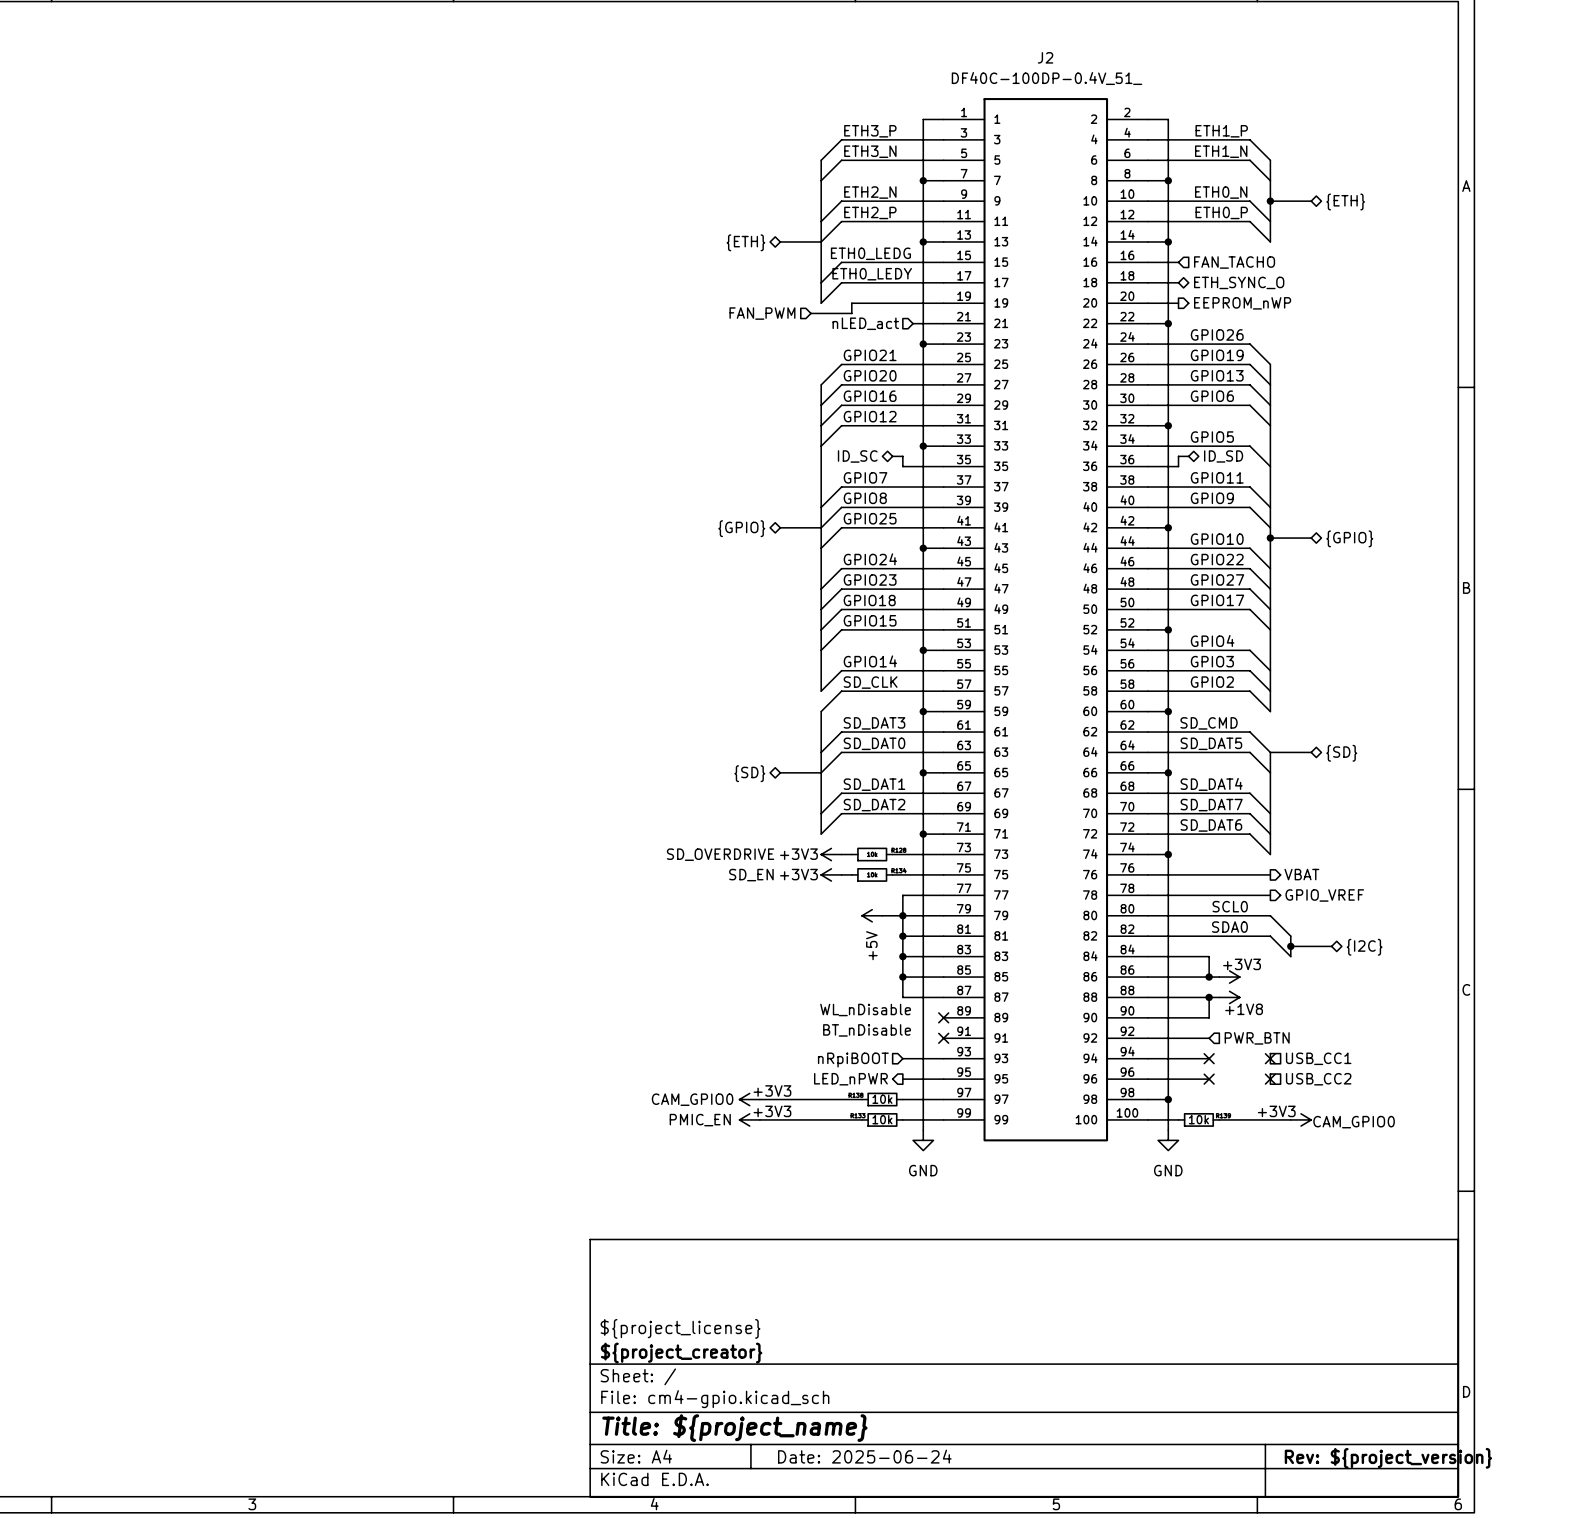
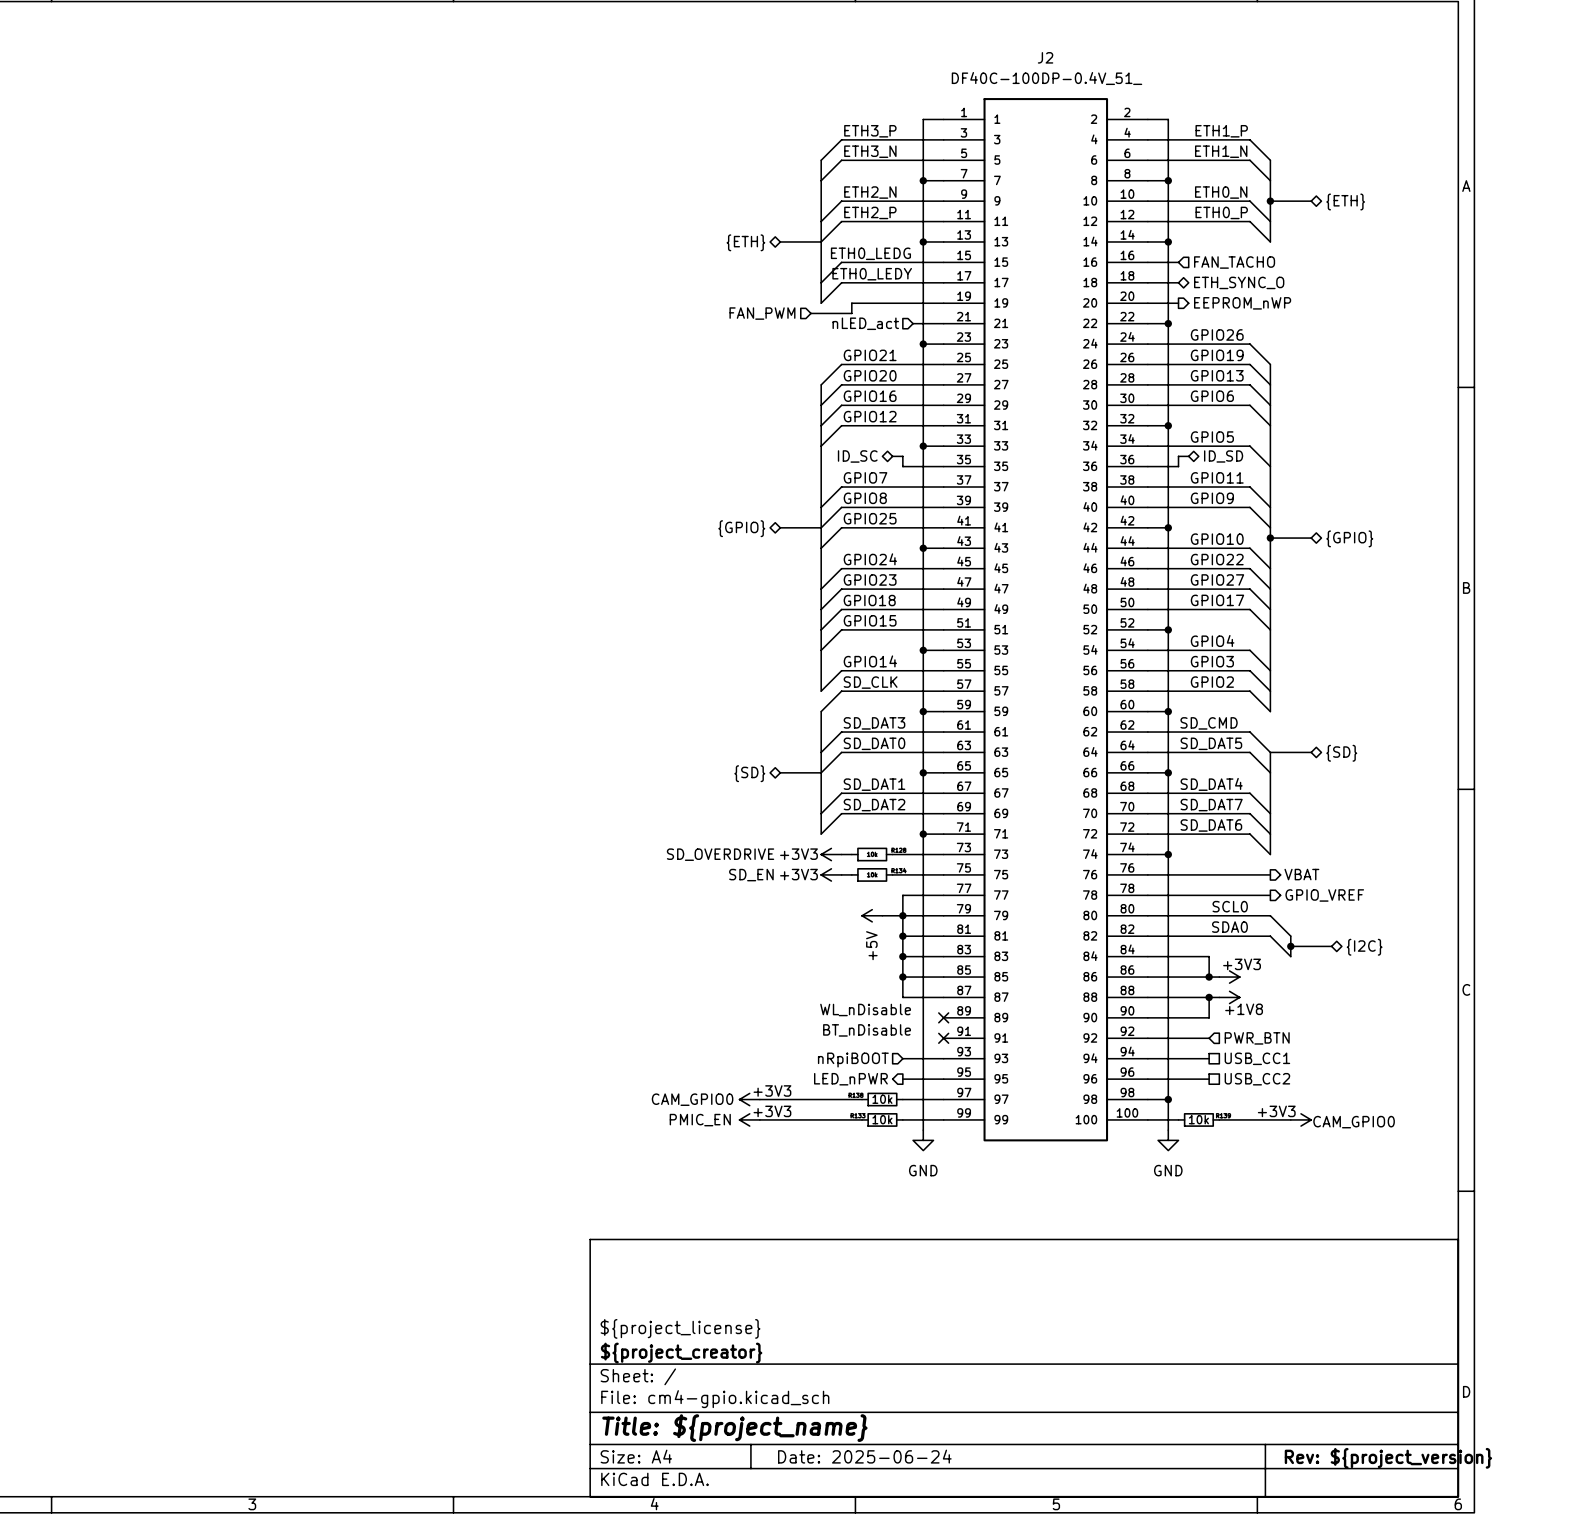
no-connect mark: (1209, 1058) -> none
no-connect mark: (1270, 1058) -> none
hierarchical label position: USB_CC1 (1318, 1058) -> USB_CC1 (1257, 1058)
no-connect mark: (1209, 1079) -> none
no-connect mark: (1270, 1079) -> none
hierarchical label position: USB_CC2 (1318, 1079) -> USB_CC2 (1257, 1079)

